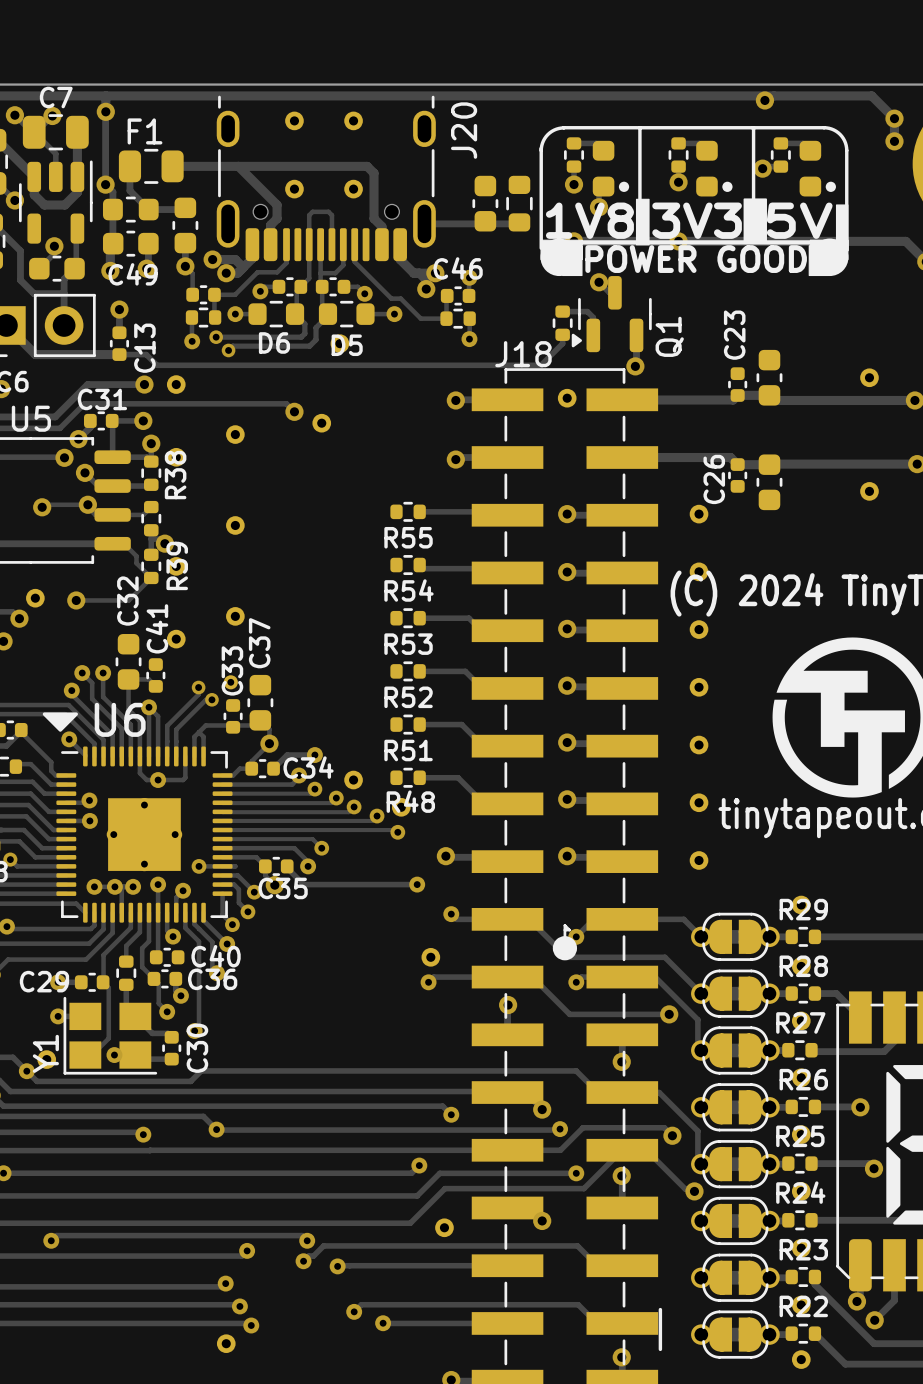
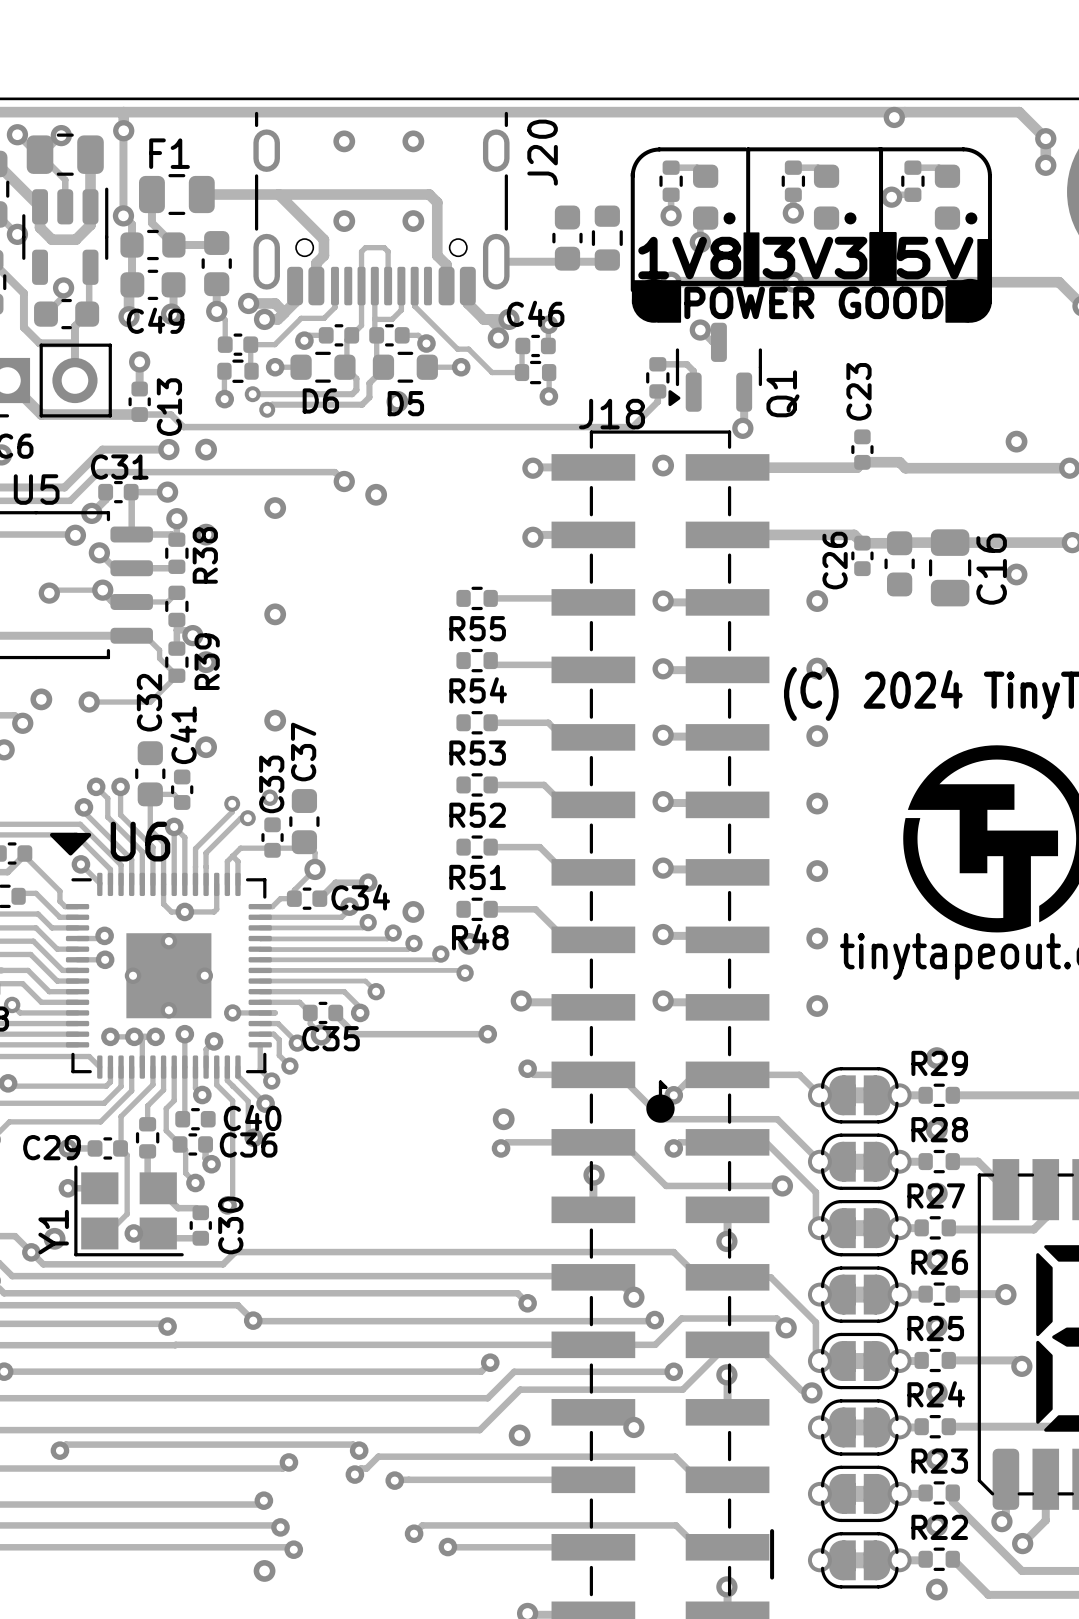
C7 name: C7 (56, 97) -> none
part: (769, 377) -> none
C16: none -> (950, 567)

